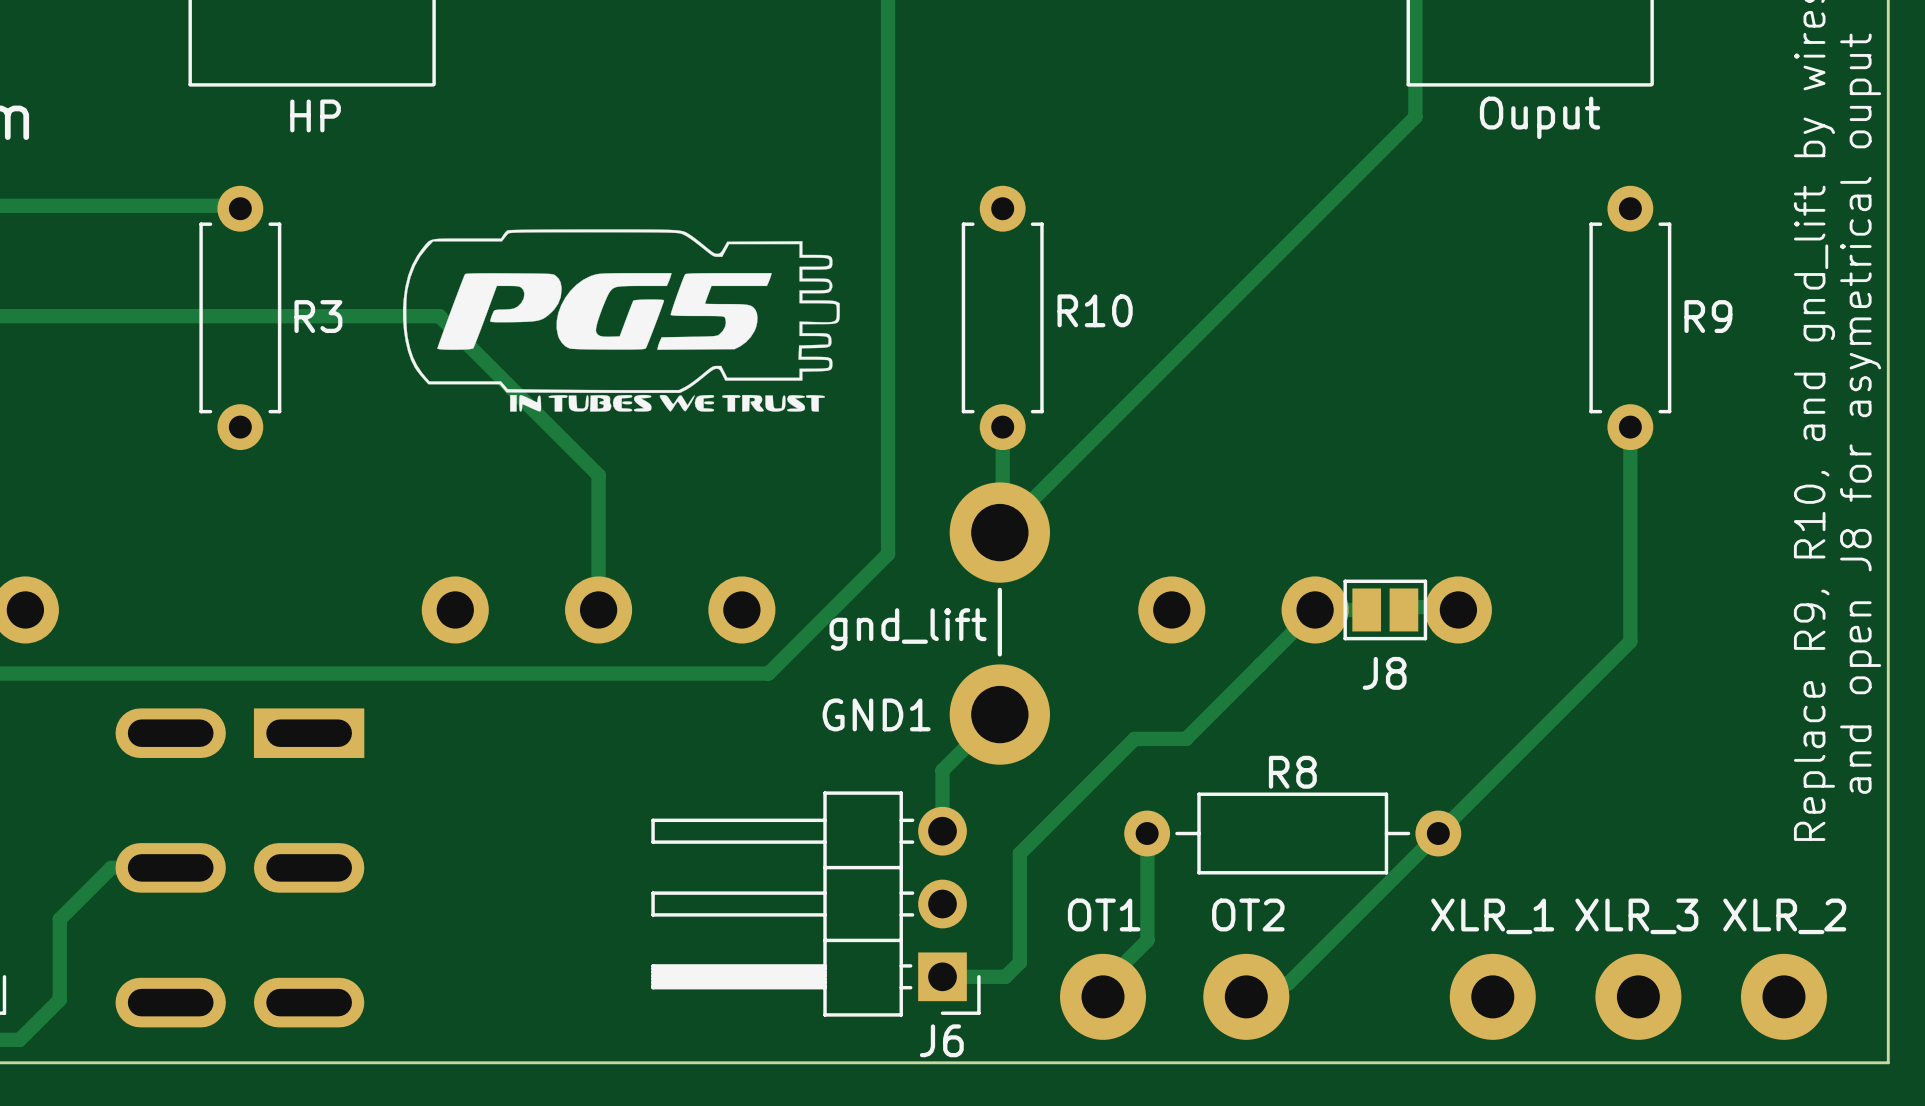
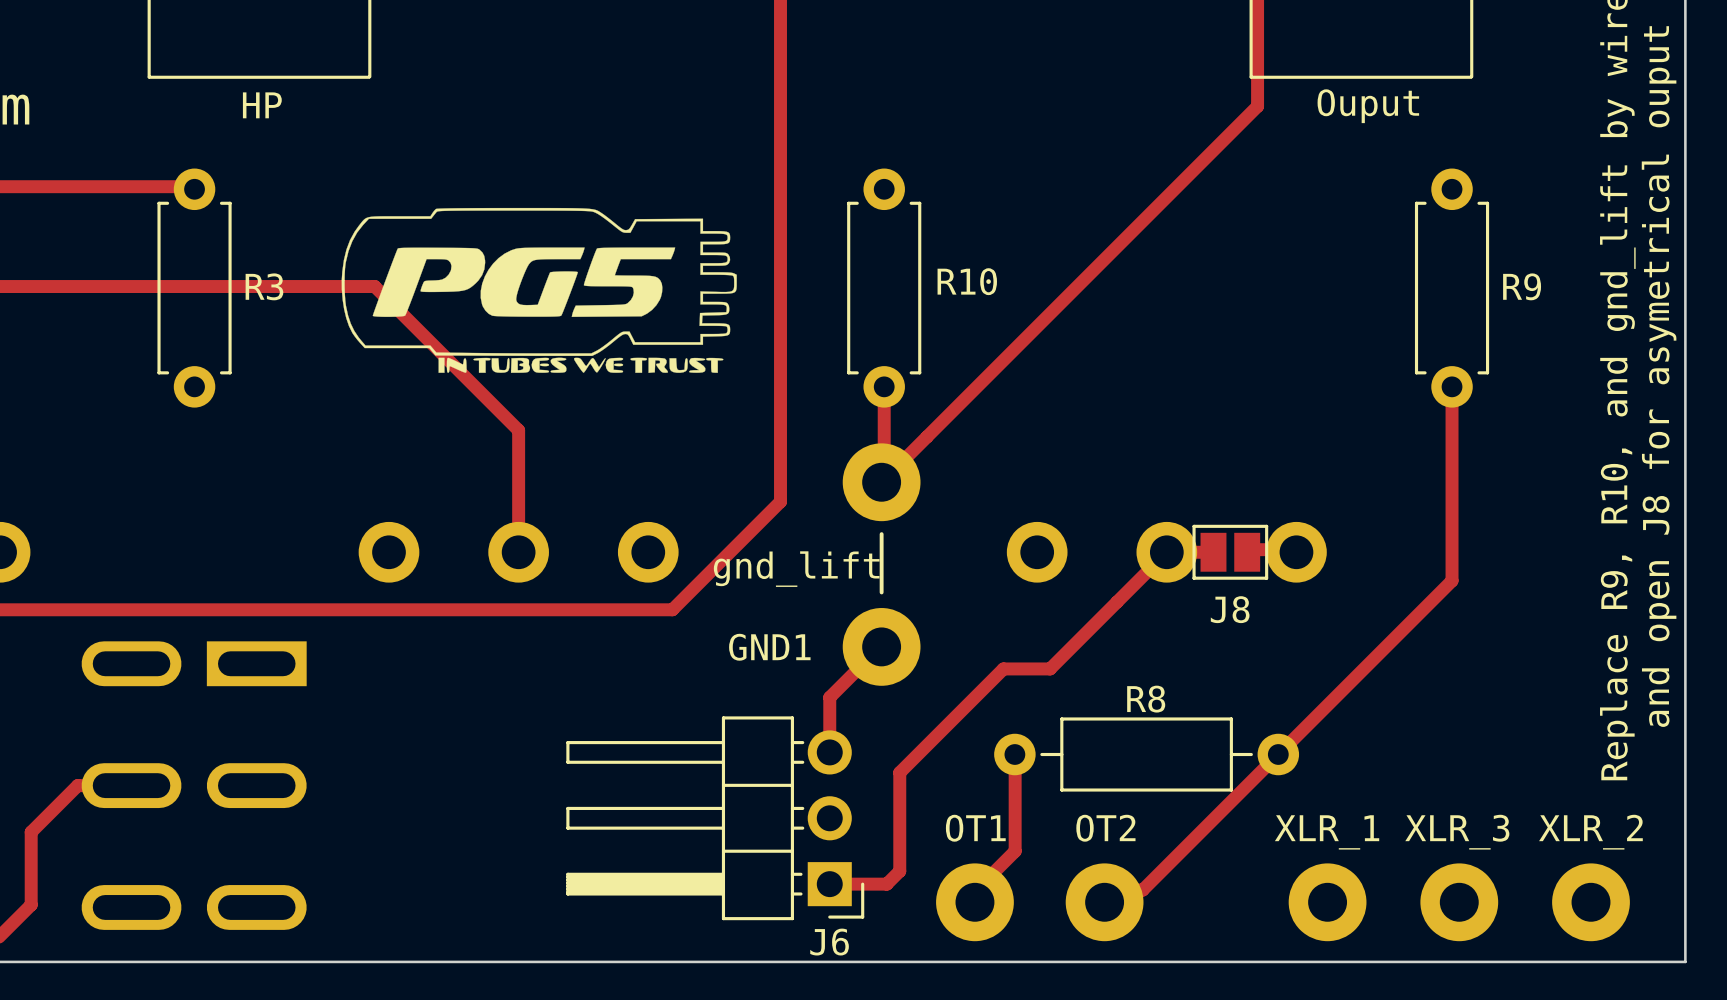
GND1 footprint: [949, 482, 1050, 765] -> [842, 443, 921, 686]

